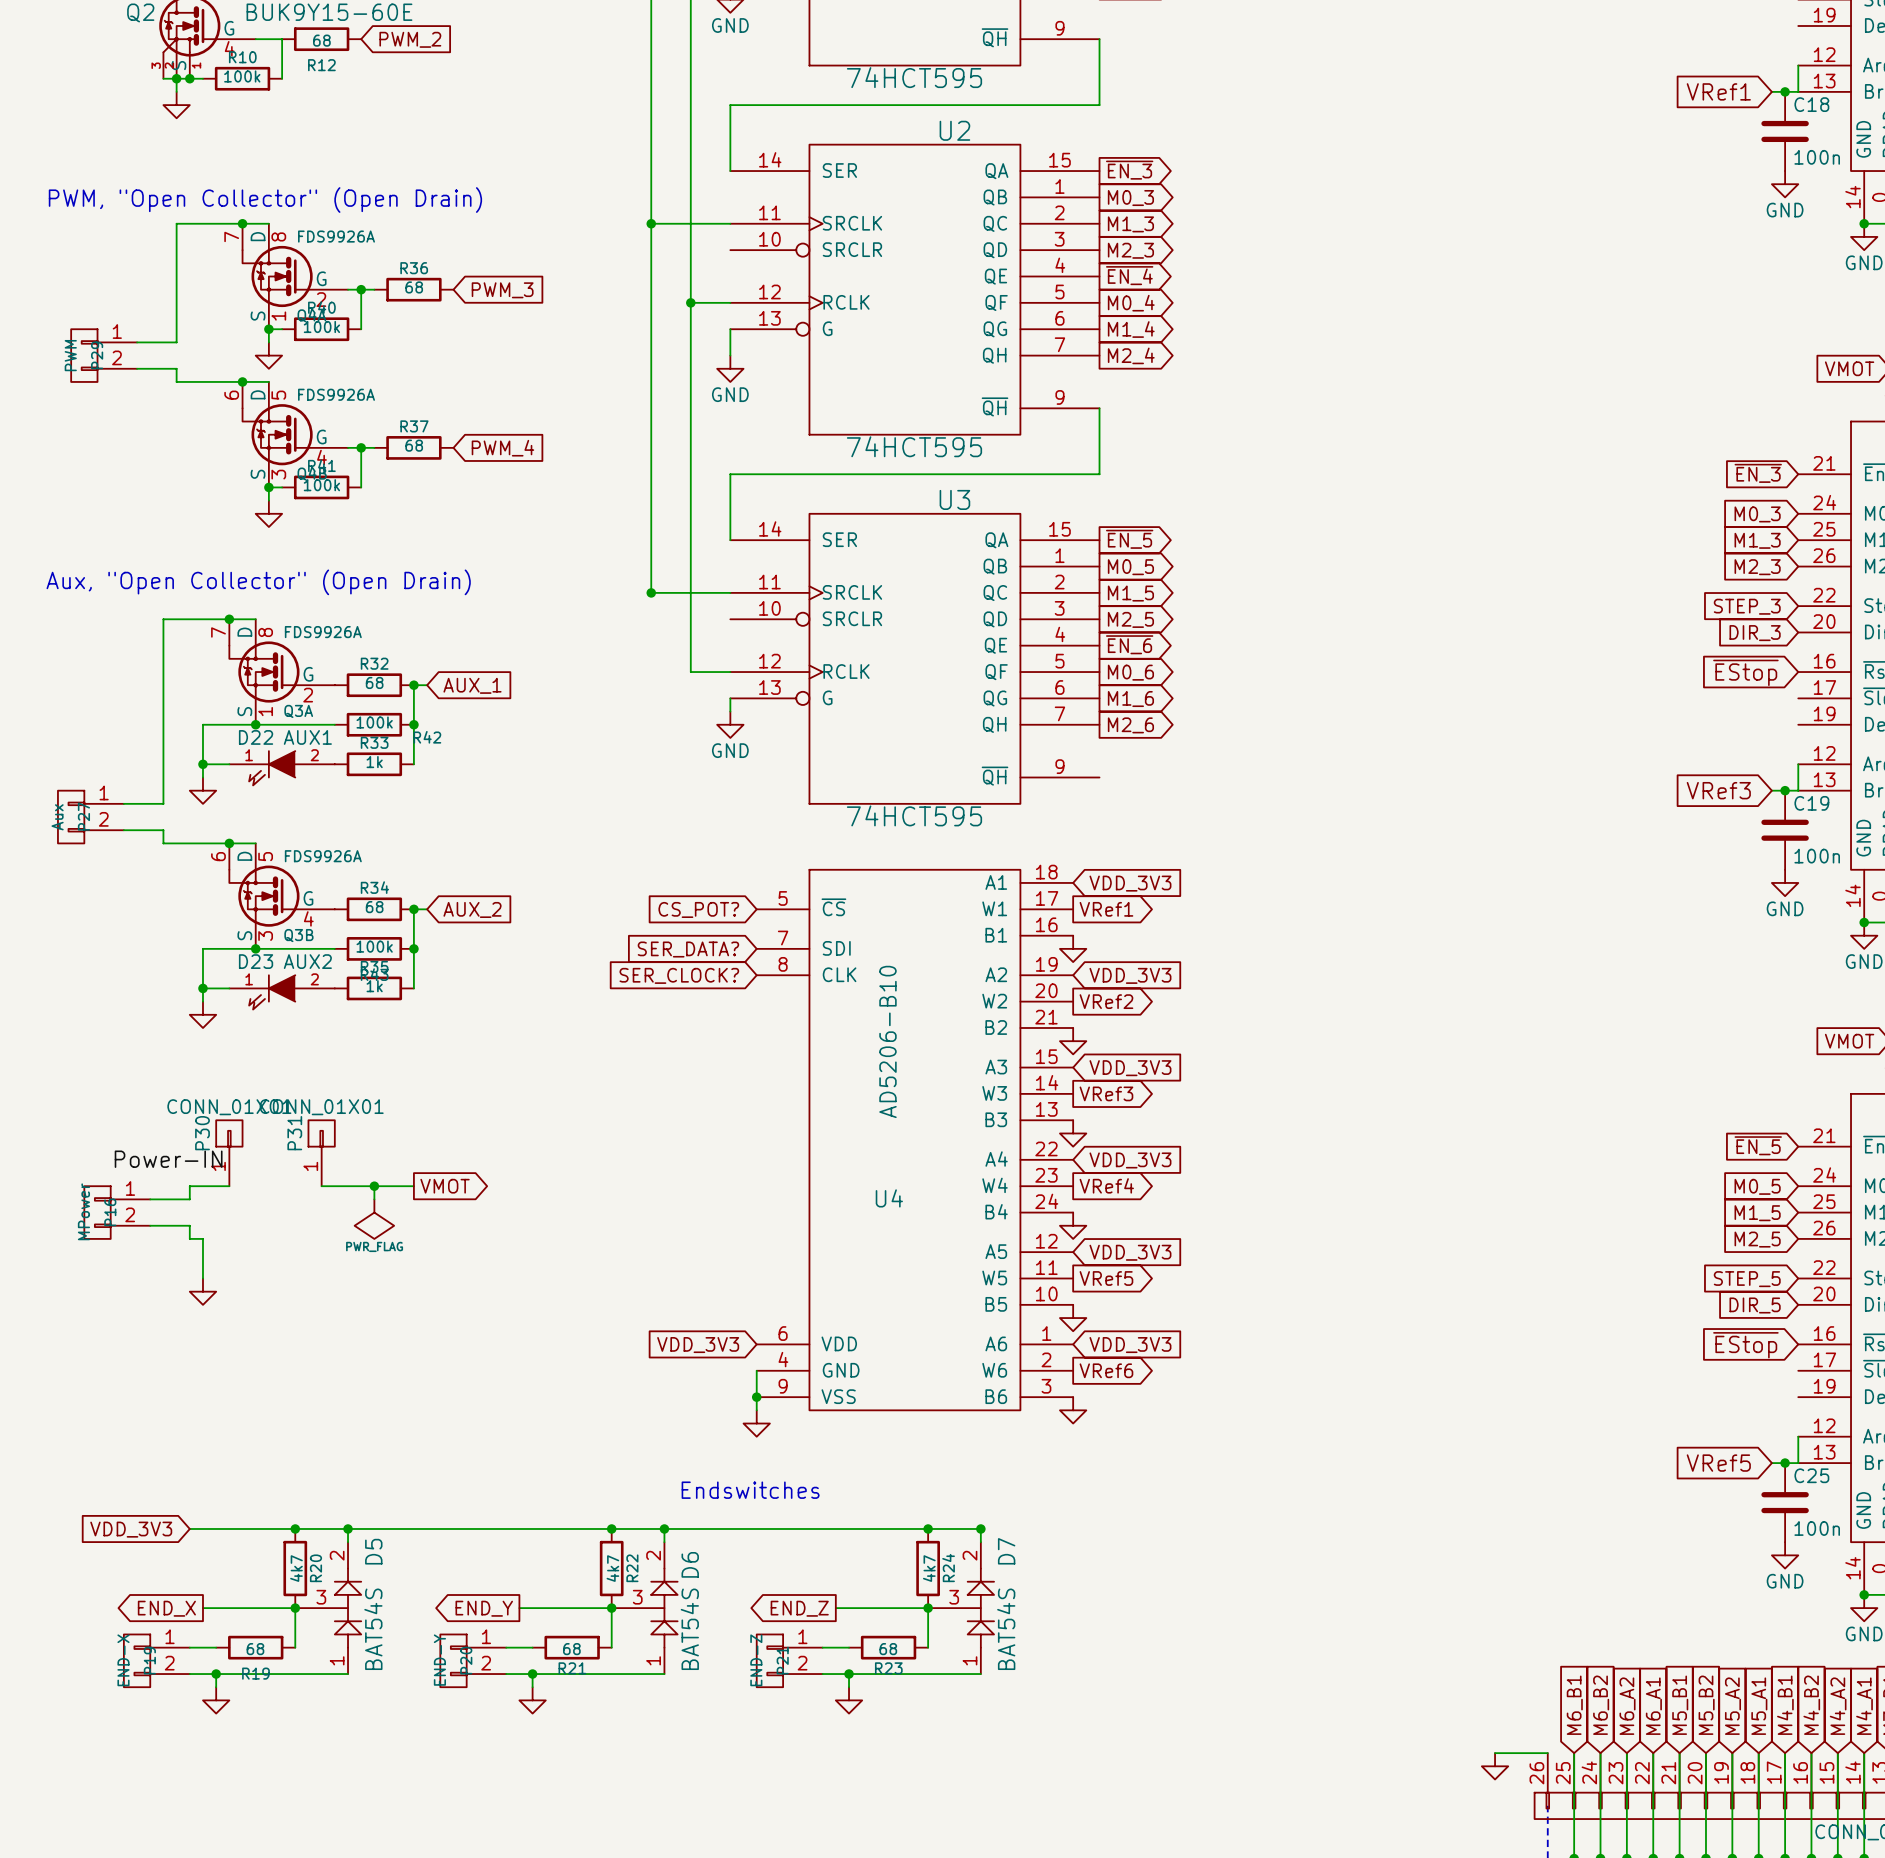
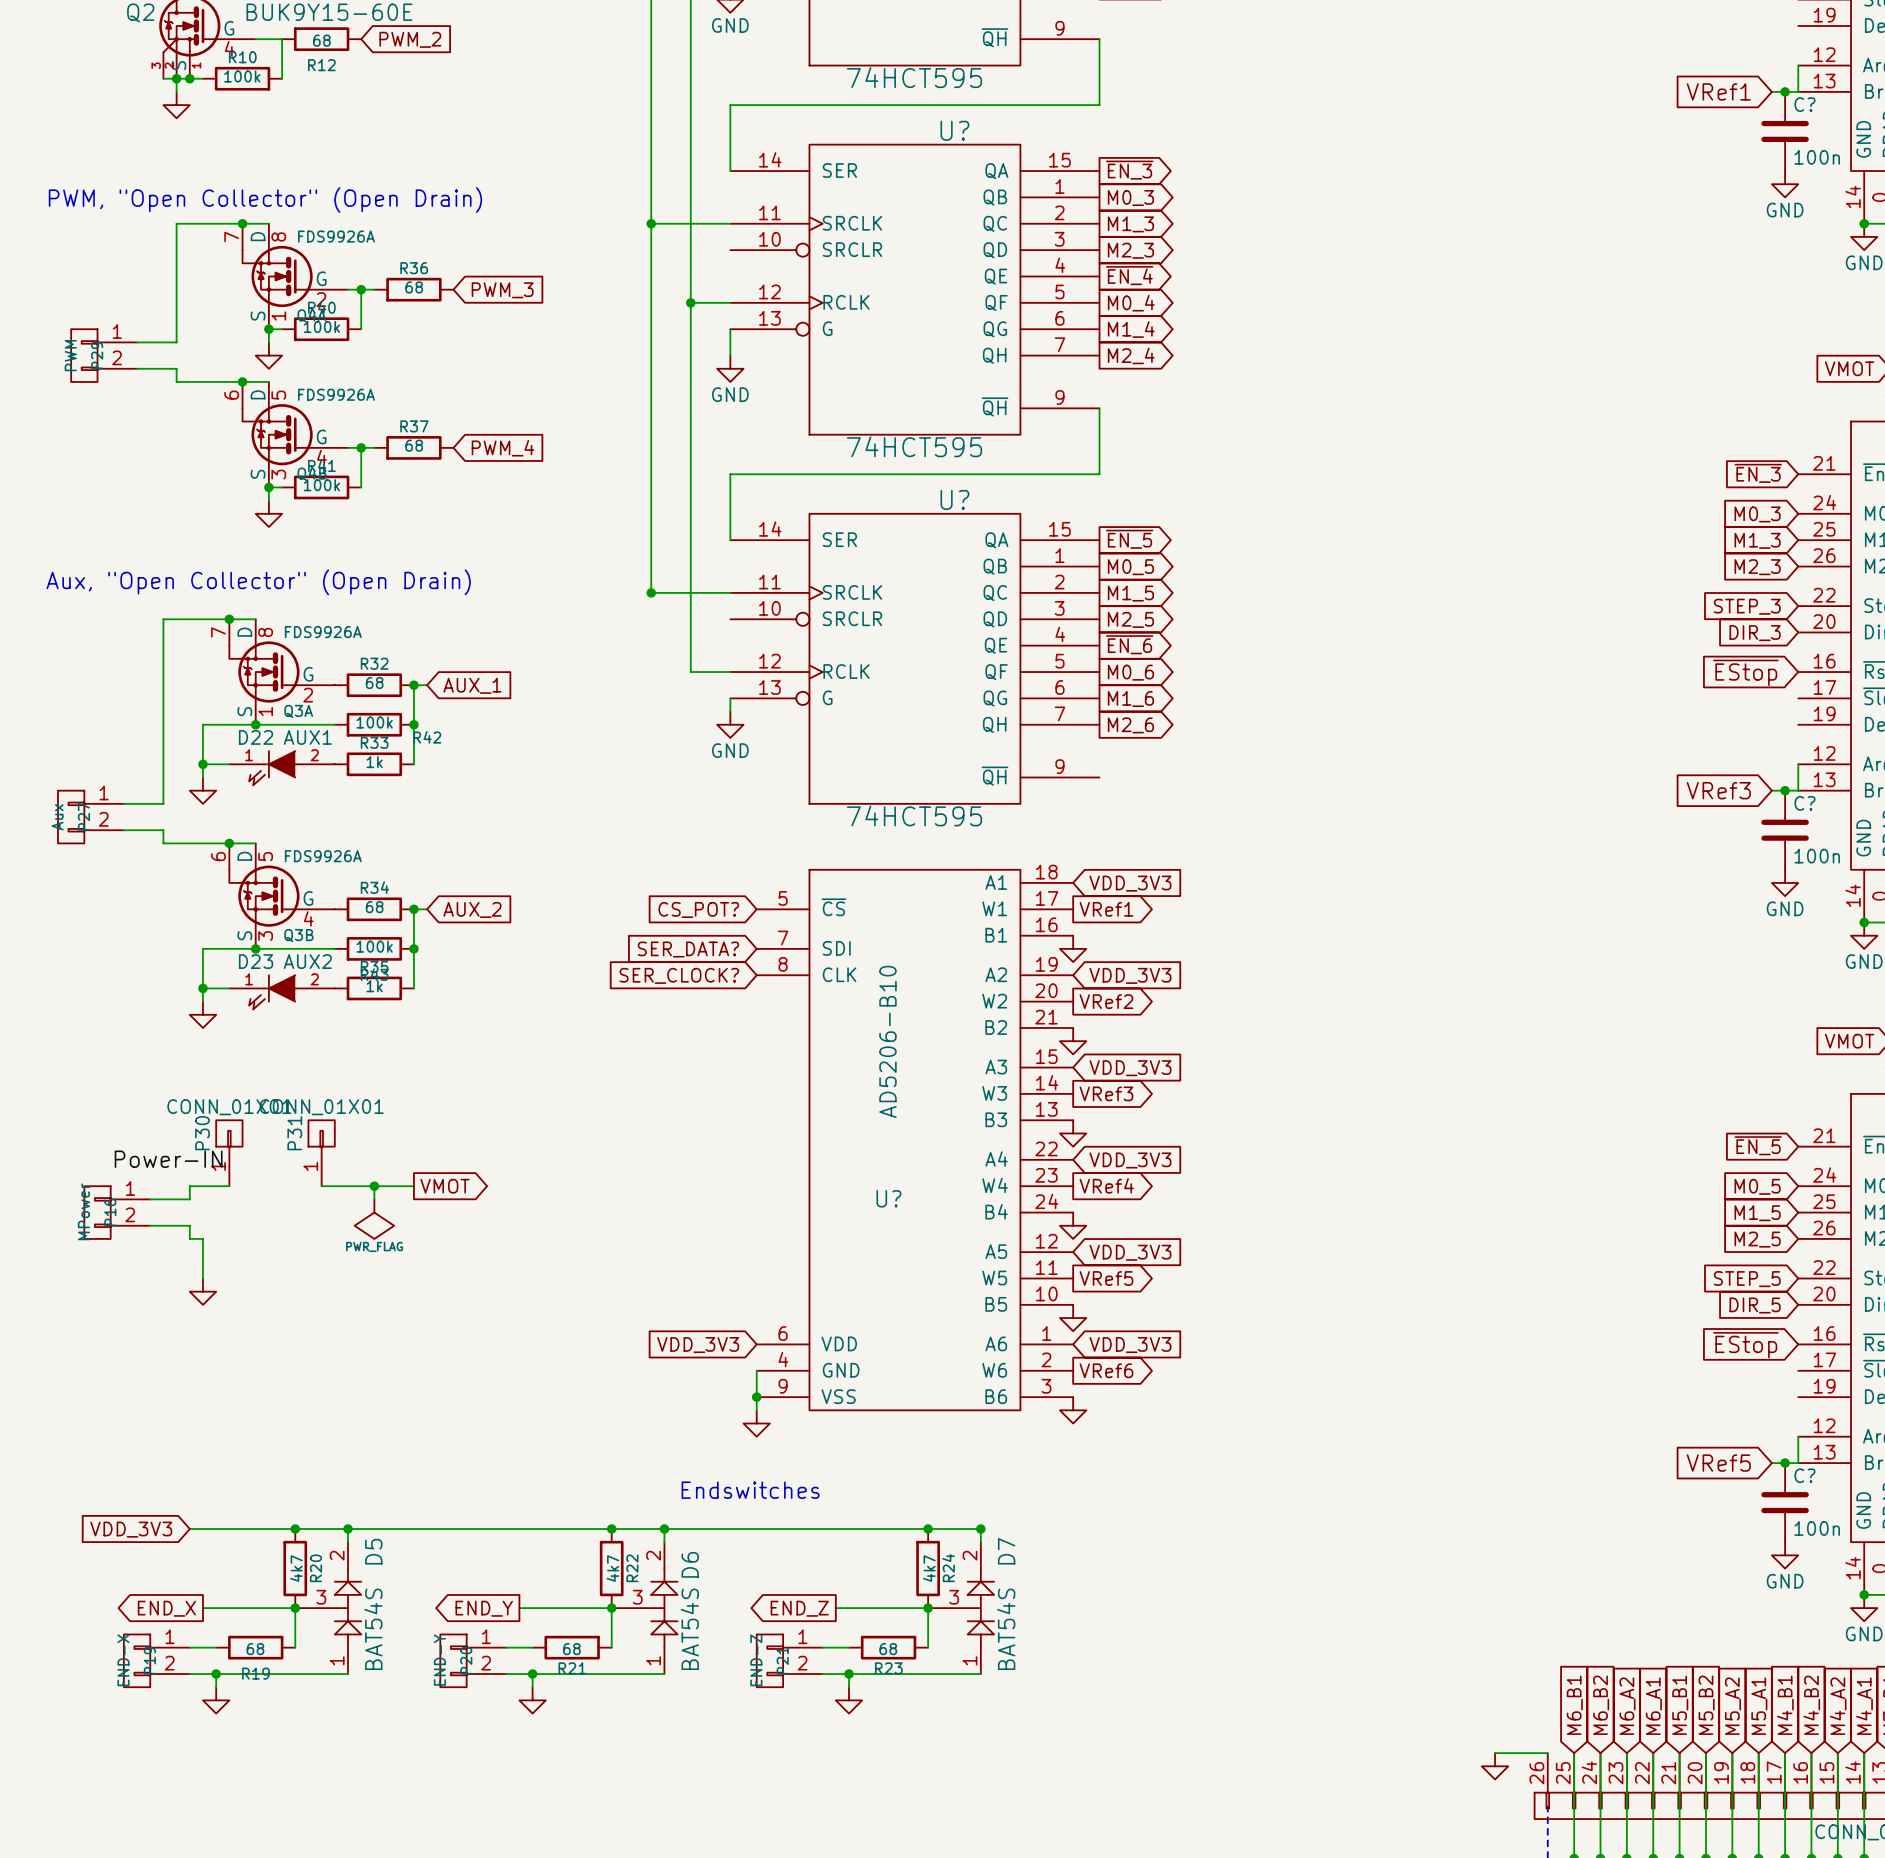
C18 name: C18 (1811, 104) -> C? (1804, 104)
U2 name: U2 (954, 130) -> U? (954, 130)
U3 name: U3 (954, 499) -> U? (954, 499)
C19 name: C19 (1811, 803) -> C? (1804, 803)
U4 name: U4 (889, 1198) -> U? (888, 1198)
C25 name: C25 (1811, 1475) -> C? (1804, 1475)

